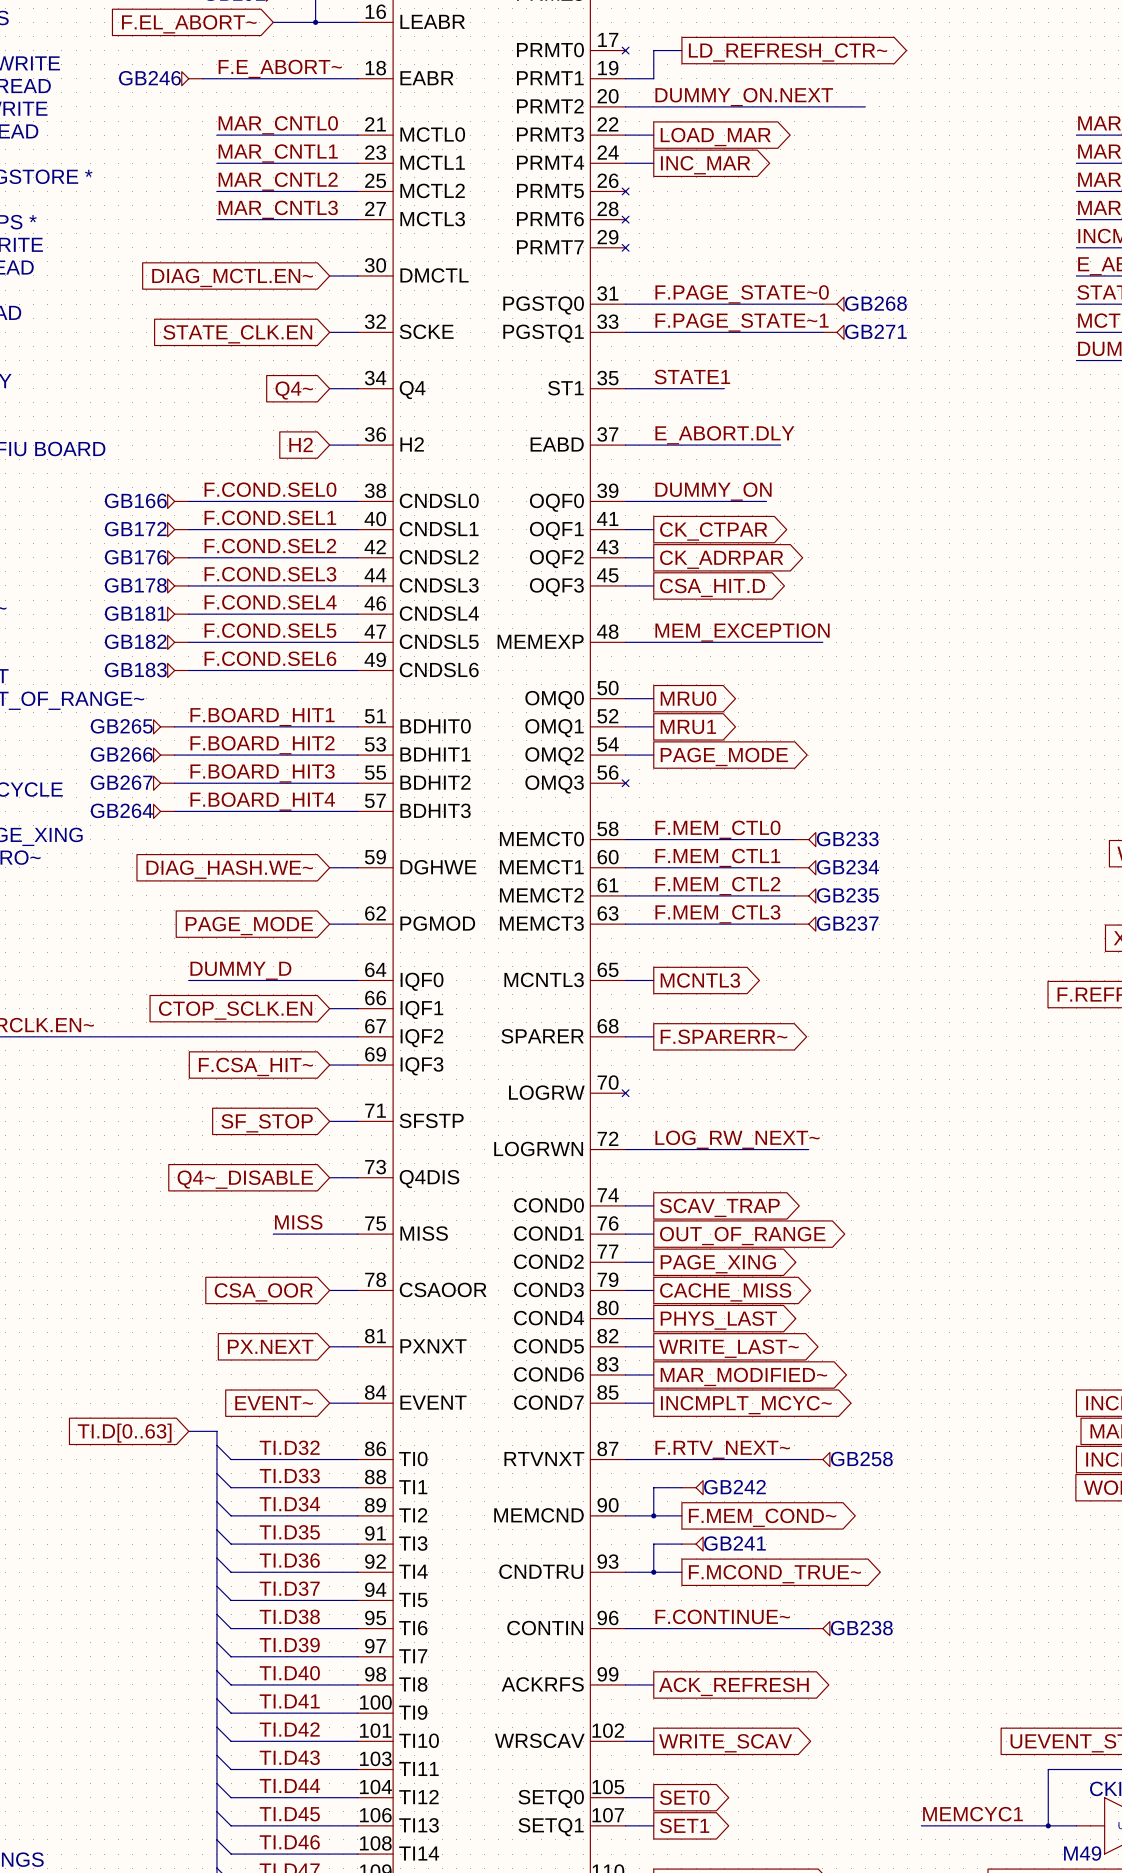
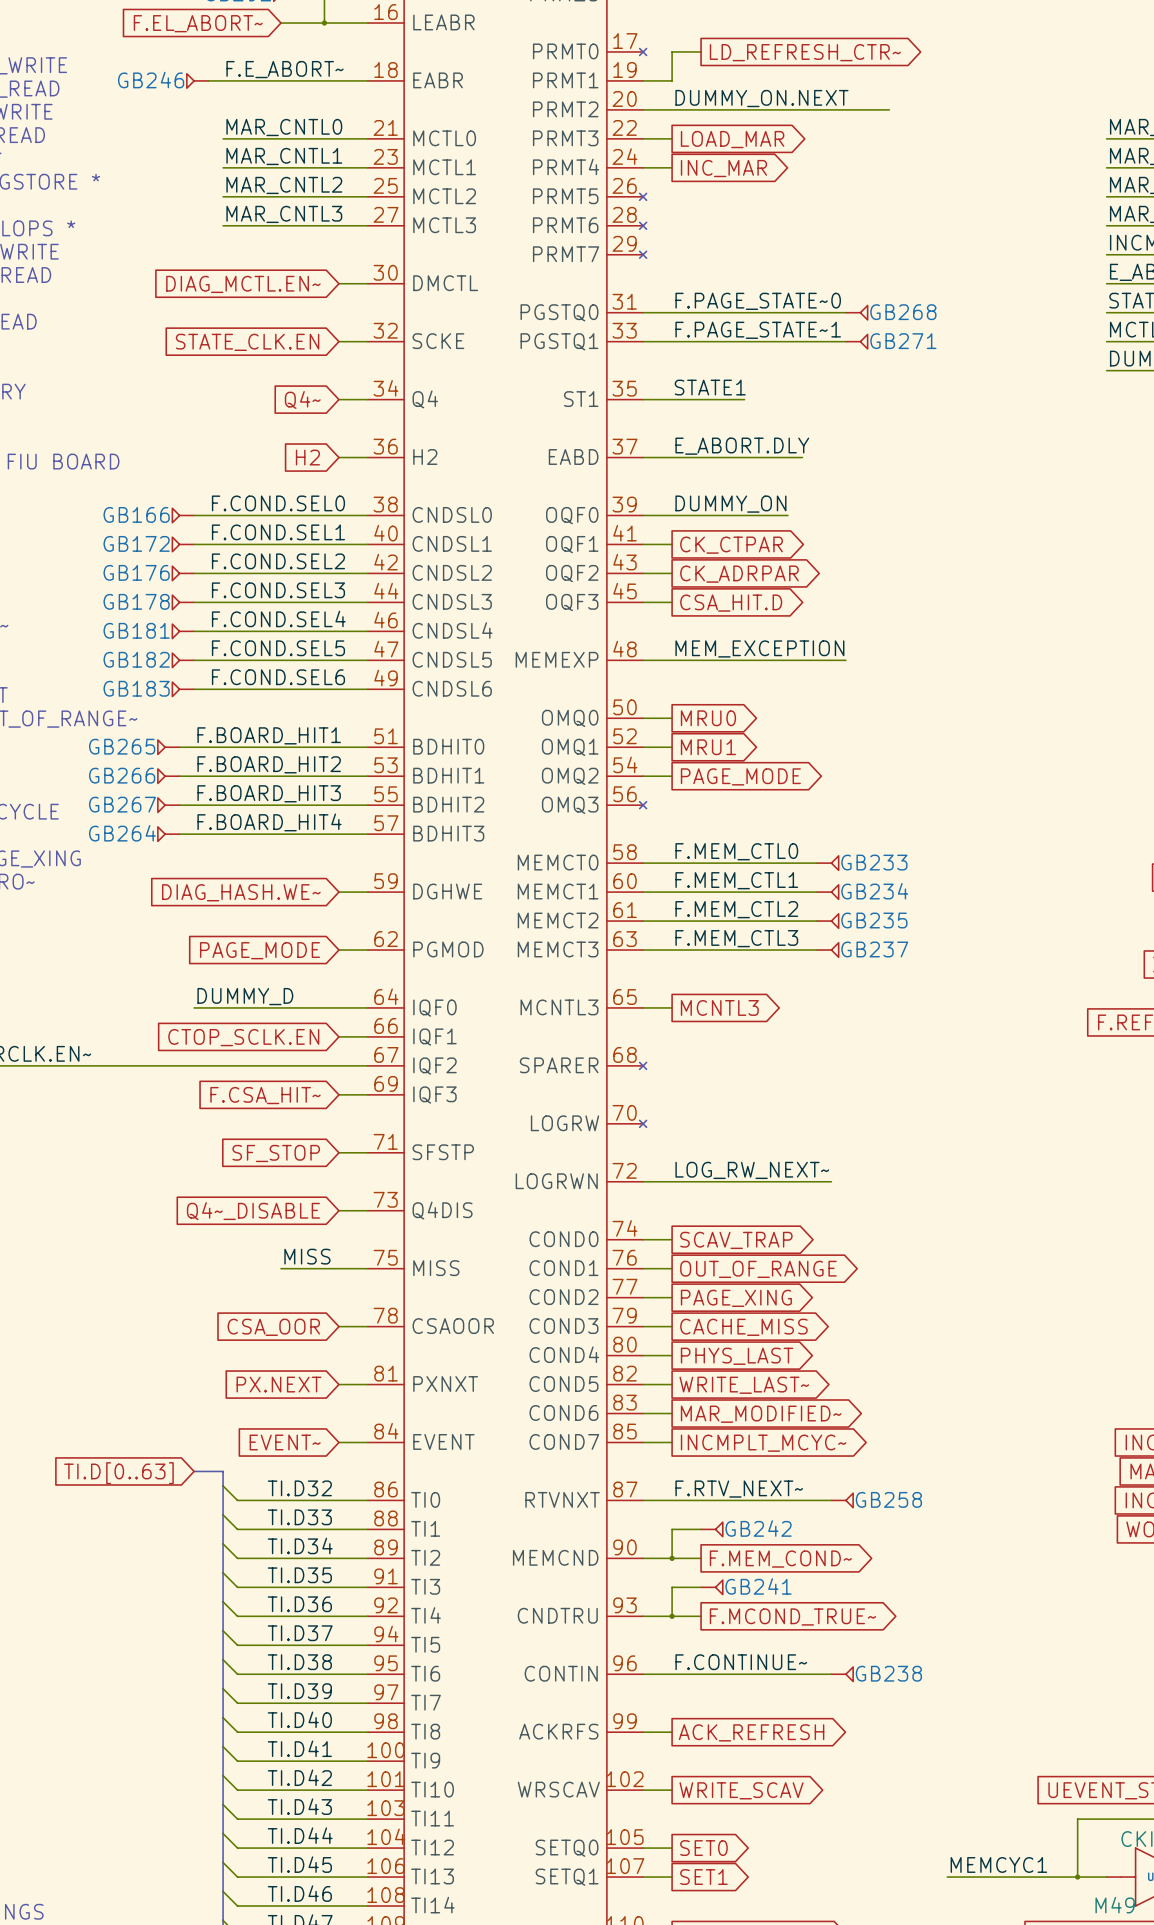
wire: (625, 1036) (653, 1036) -> none
no-connect mark: none -> (643, 1065)
global label: F.SPARERR~ (724, 1036) -> none

